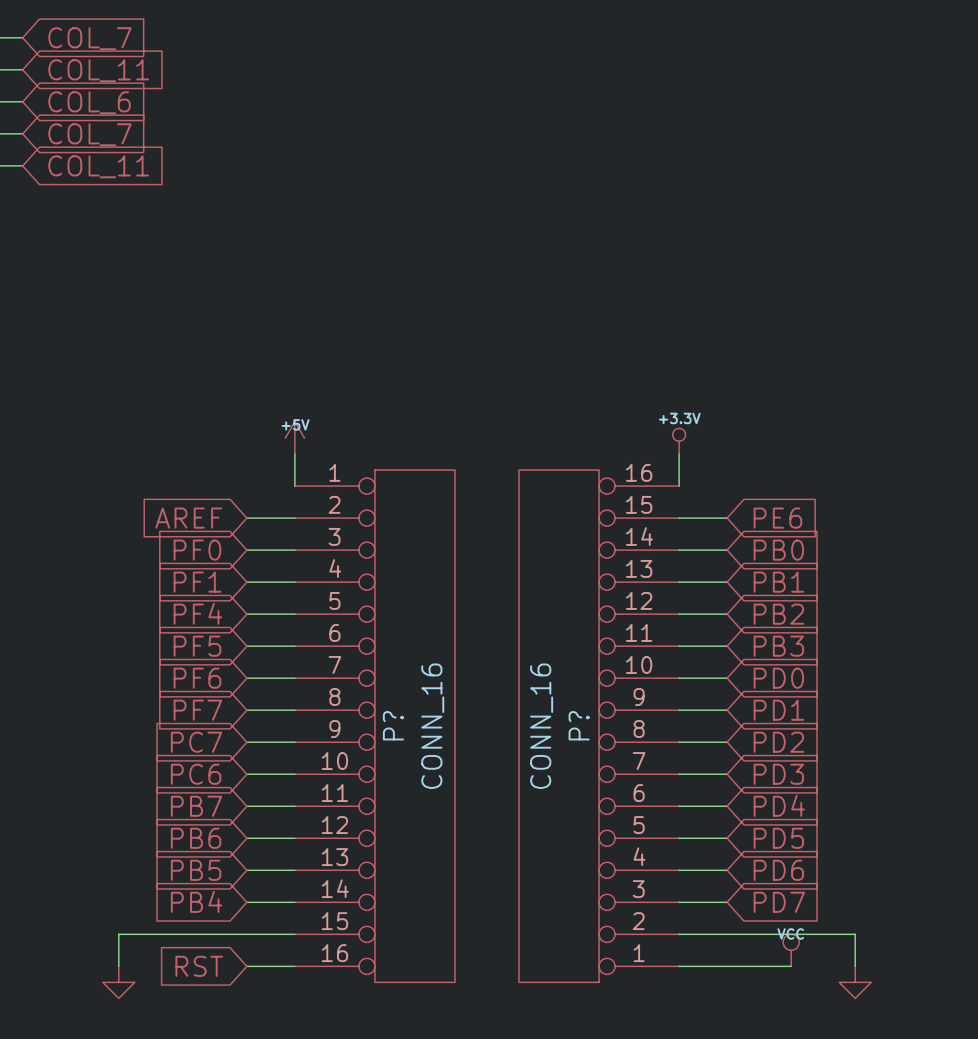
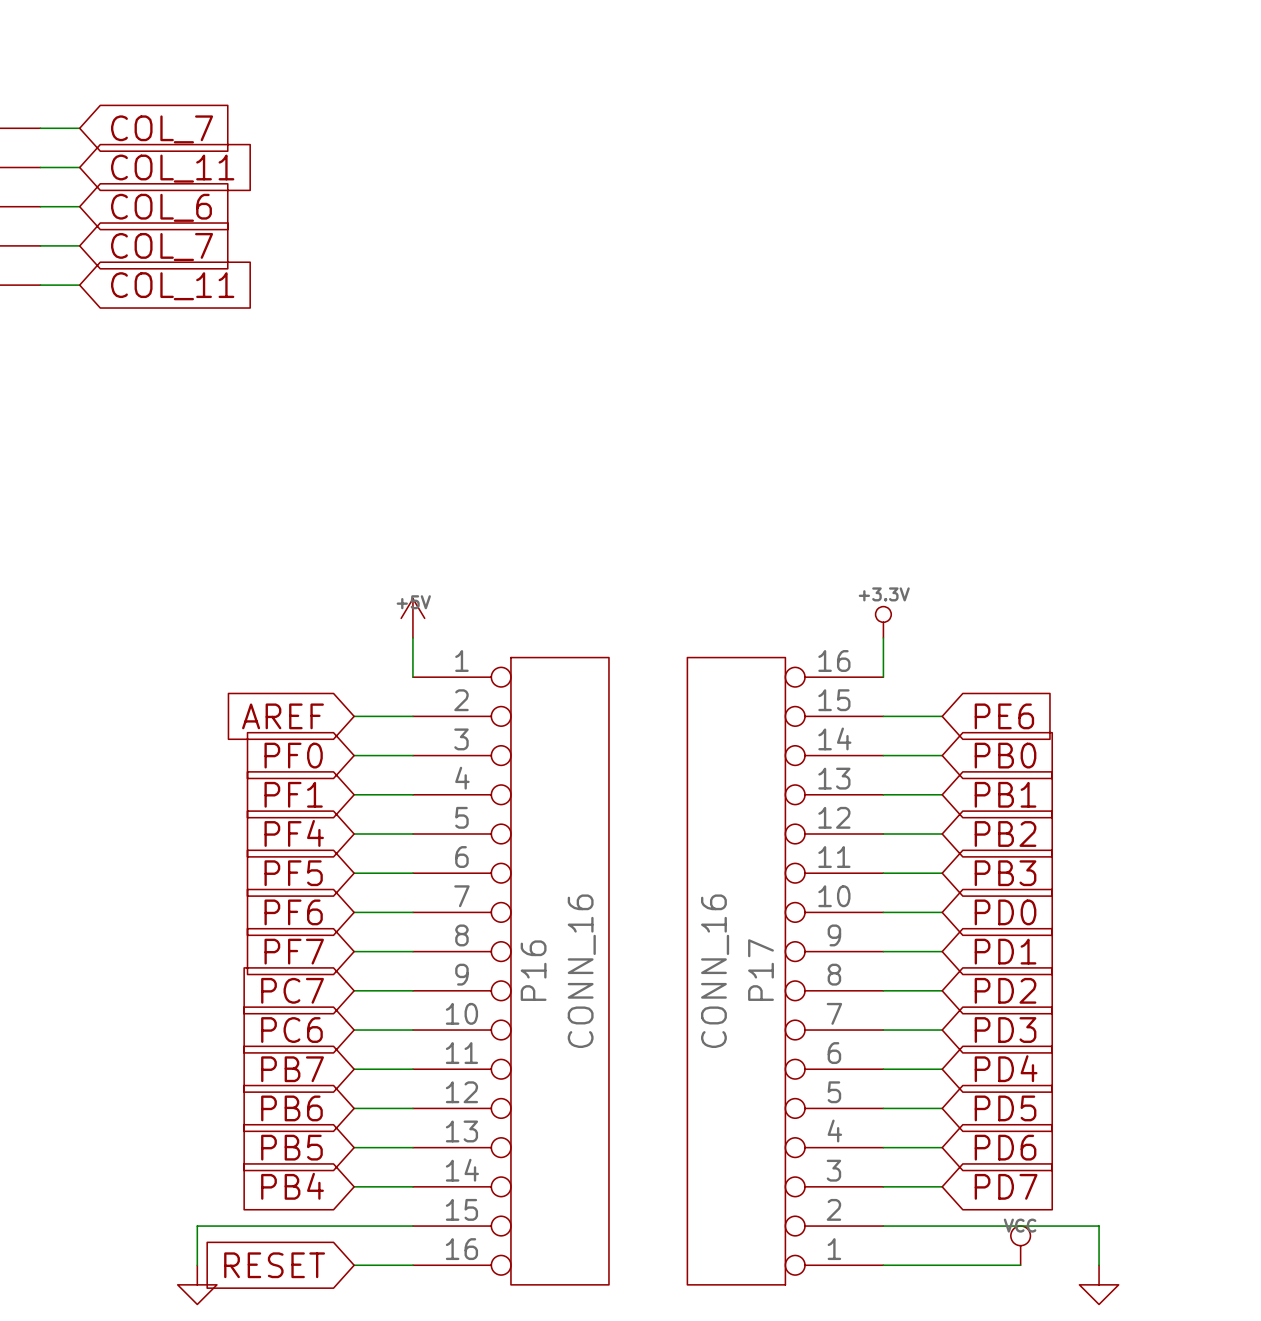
P? name: P? (393, 725) -> P16 (533, 970)
P? name: P? (579, 725) -> P17 (760, 970)
global label: RST (199, 966) -> RESET (274, 1265)

